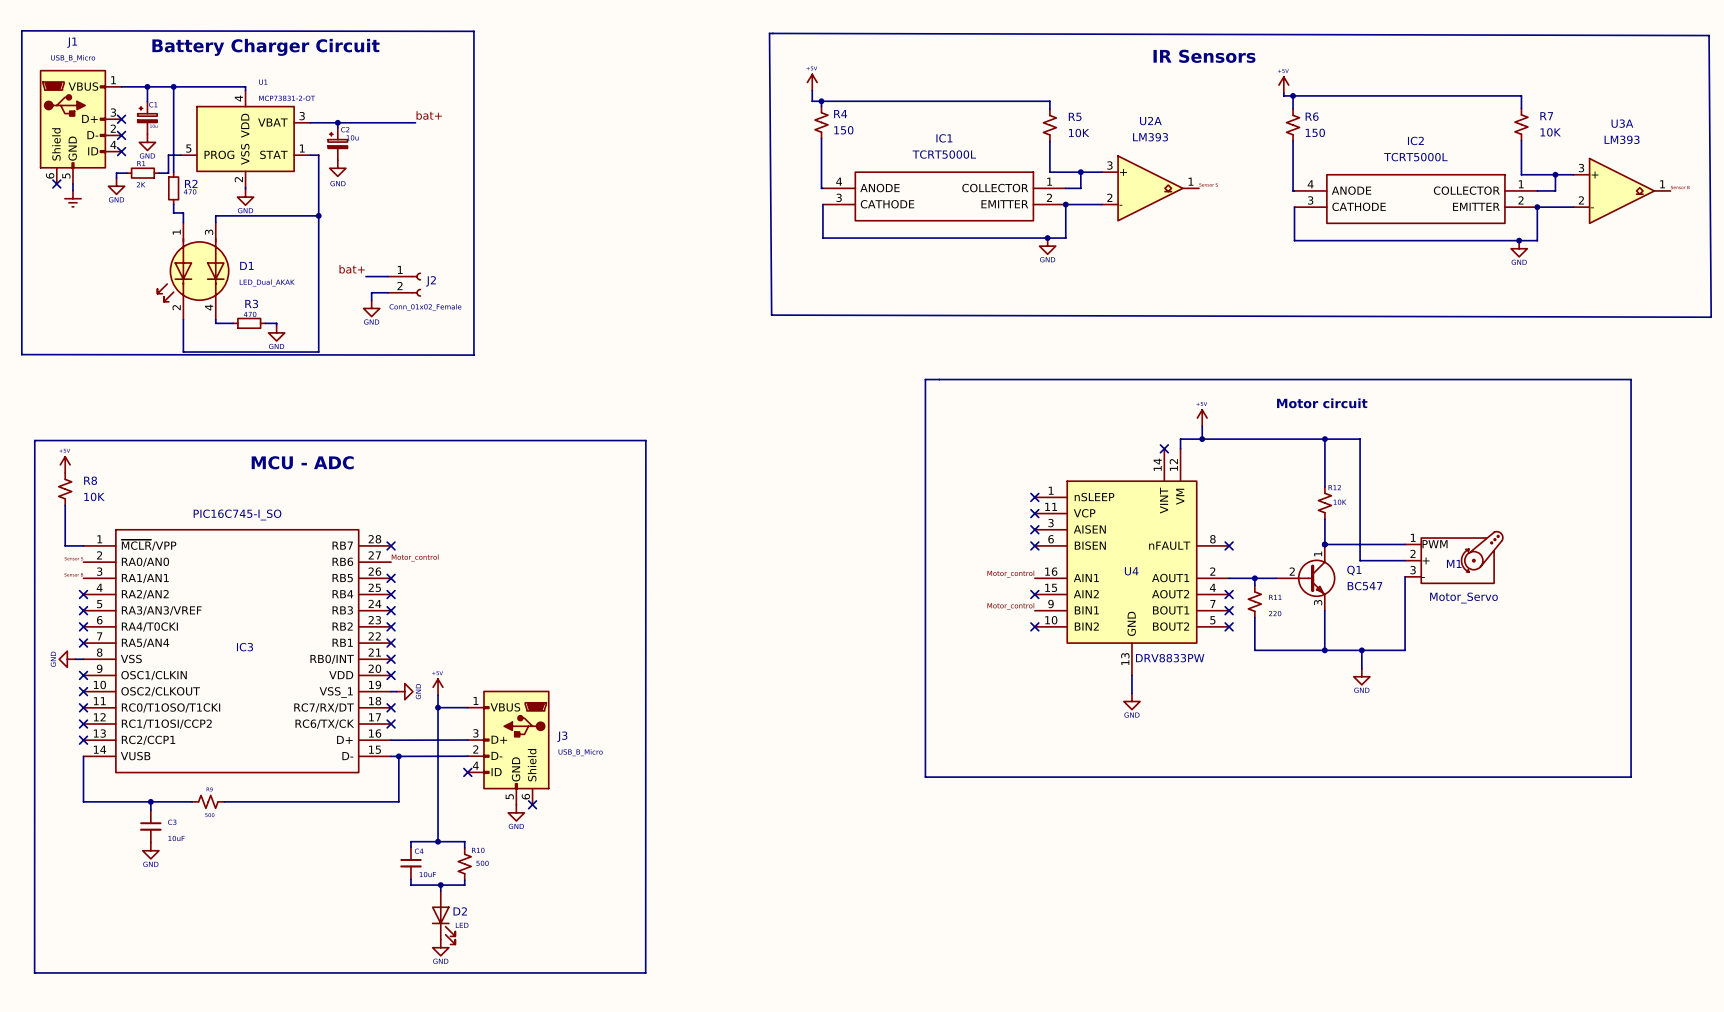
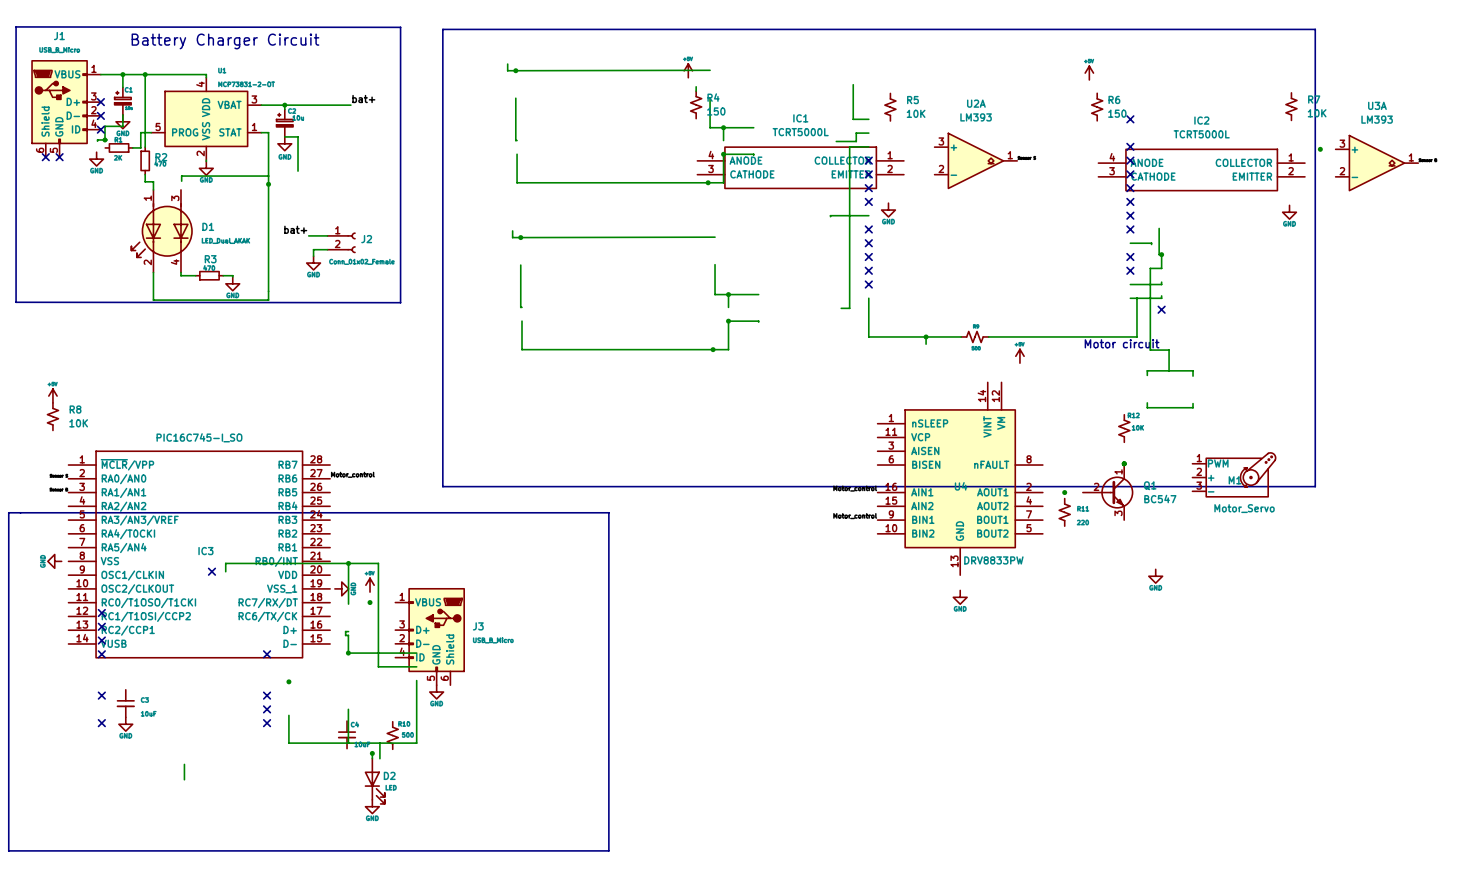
line: none -> (442, 29) (442, 486) (1315, 486) (1315, 29) (442, 29)
line: (772, 33) (1709, 35) (1711, 317) (771, 315) (769, 33) (773, 33) -> none
text: IR Sensors (1204, 56) -> none
wire: none -> (507, 64) (507, 70) (710, 70)
junction: none -> (515, 70)
wire: (812, 90) (812, 101) (1049, 101) (1049, 109) -> none
wire: (1283, 93) (1283, 95) (1521, 95) (1521, 108) -> none
wire: (1293, 95) (1293, 108) -> none
junction: (1293, 95) -> none
wire: none -> (853, 84) (853, 119) (868, 119)
junction: (821, 101) -> none
wire: none -> (515, 98) (517, 140)
wire: none -> (710, 97) (710, 127) (753, 127)
wire: none -> (122, 114) (122, 126) (104, 126) (104, 139)
wire: (821, 138) (822, 188) -> none
no-connect mark: none -> (1130, 119)
wire: (1521, 140) (1521, 174) (1573, 174) -> none
wire: (1049, 141) (1049, 172) (1101, 172) -> none
wire: (1293, 141) (1294, 190) -> none
wire: none -> (723, 127) (723, 140)
junction: none -> (723, 127)
wire: none -> (868, 133) (856, 133) (856, 141) (836, 141)
wire: none -> (284, 136) (298, 136) (298, 171)
junction: none -> (104, 139)
wire: none -> (107, 139) (97, 141)
wire: none -> (868, 146) (849, 146) (849, 308) (841, 308)
no-connect mark: none -> (1130, 146)
wire: (1080, 172) (1080, 188) (1065, 188) -> none
junction: (1080, 172) -> none
wire: (126, 173) (116, 173) (116, 178) -> none
wire: (1555, 174) (1555, 190) (1537, 190) -> none
wire: none -> (517, 154) (517, 182) (723, 182) (723, 154) (753, 155)
junction: none -> (723, 154)
wire: (72, 183) (72, 190) -> none
no-connect mark: none -> (59, 157)
no-connect mark: none -> (868, 160)
no-connect mark: none -> (1130, 160)
power symbol: (72, 198) -> none
wire: (822, 204) (822, 238) (1065, 238) (1065, 204) (1101, 204) -> none
no-connect mark: none -> (868, 174)
junction: (1065, 204) -> none
no-connect mark: none -> (1130, 174)
wire: none -> (268, 176) (181, 176) (181, 181)
wire: (1294, 207) (1294, 240) (1537, 240) (1537, 207) (1573, 207) -> none
junction: (1537, 207) -> none
junction: none -> (708, 182)
wire: (318, 215) (215, 215) (215, 222) -> none
no-connect mark: none -> (868, 188)
no-connect mark: none -> (1130, 188)
no-connect mark: none -> (868, 201)
no-connect mark: none -> (1130, 201)
junction: (1047, 238) -> none
junction: (1519, 240) -> none
wire: none -> (868, 215) (830, 216)
no-connect mark: none -> (1130, 215)
wire: none -> (1159, 228) (1159, 254) (1161, 254) (1161, 268) (1150, 268) (1150, 350) (1169, 350) (1169, 370)
no-connect mark: none -> (868, 229)
no-connect mark: none -> (1130, 229)
wire: none -> (512, 230) (512, 237) (715, 237)
junction: none -> (520, 237)
no-connect mark: none -> (868, 243)
wire: none -> (1130, 243) (1151, 244)
junction: none -> (1161, 254)
no-connect mark: none -> (868, 256)
no-connect mark: none -> (1130, 256)
wire: none -> (520, 265) (522, 307)
wire: none -> (715, 264) (715, 294) (758, 294)
no-connect mark: none -> (868, 270)
no-connect mark: none -> (1130, 270)
wire: none -> (1161, 282) (1161, 284) (1130, 284)
no-connect mark: none -> (868, 284)
wire: none -> (728, 294) (728, 307)
junction: none -> (728, 294)
wire: none -> (1161, 295) (1161, 298) (1130, 298)
wire: none -> (868, 298) (868, 336) (961, 336)
wire: none -> (1136, 298) (1136, 336) (988, 336)
no-connect mark: none -> (1161, 309)
wire: none -> (522, 321) (522, 349) (728, 349) (728, 321) (758, 322)
junction: none -> (728, 321)
line: (925, 379) (925, 777) (1631, 777) (1631, 379) (925, 379) -> none
wire: none -> (926, 336) (926, 344)
junction: none -> (926, 336)
junction: none -> (713, 349)
wire: (1202, 426) (1202, 439) -> none
junction: (1202, 439) -> none
wire: (1324, 439) (1324, 486) -> none
junction: (1324, 439) -> none
line: (34, 440) (34, 972) (645, 972) (645, 440) (34, 440) -> (8, 512) (8, 850) (608, 850) (608, 512) (8, 512)
wire: none -> (1147, 375) (1147, 370) (1193, 370) (1193, 376)
no-connect mark: (1164, 448) -> none
wire: (1180, 448) (1180, 439) (1360, 439) (1360, 560) (1405, 560) -> none
text: MCU - ADC (302, 462) -> none
wire: none -> (1147, 402) (1147, 407) (1193, 407) (1193, 403)
no-connect mark: (1034, 497) -> none
wire: (65, 505) (65, 545) (83, 545) -> none
no-connect mark: (1034, 513) -> none
wire: (1324, 519) (1324, 544) -> none
no-connect mark: (1034, 529) -> none
wire: (1405, 544) (1324, 545) -> none
no-connect mark: (391, 545) -> none
no-connect mark: (1034, 545) -> none
no-connect mark: (1229, 545) -> none
wire: (1405, 576) (1405, 650) (1254, 650) (1254, 617) -> none
no-connect mark: (391, 578) -> none
wire: (1229, 578) (1276, 578) -> none
wire: (1254, 578) (1254, 585) -> none
no-connect mark: (83, 594) -> none
no-connect mark: (391, 594) -> none
no-connect mark: (1034, 594) -> none
no-connect mark: (1229, 594) -> none
no-connect mark: (83, 610) -> none
no-connect mark: (391, 610) -> none
no-connect mark: (1229, 610) -> none
wire: (1324, 610) (1324, 650) -> none
no-connect mark: (83, 626) -> none
no-connect mark: (391, 626) -> none
no-connect mark: (1034, 626) -> none
no-connect mark: (1229, 626) -> none
no-connect mark: (83, 643) -> none
no-connect mark: (391, 643) -> none
junction: (1324, 650) -> none
wire: (1361, 650) (1361, 668) -> none
junction: (1361, 650) -> none
wire: (75, 659) (83, 659) -> none
no-connect mark: (391, 659) -> none
wire: none -> (348, 563) (348, 604)
junction: none -> (348, 563)
no-connect mark: none -> (211, 571)
wire: none -> (225, 571) (225, 563) (378, 563) (378, 666) (416, 666)
no-connect mark: (83, 675) -> none
no-connect mark: (391, 675) -> none
wire: (1131, 675) (1131, 693) -> none
no-connect mark: (83, 691) -> none
wire: (391, 691) (396, 691) -> none
wire: (438, 695) (438, 841) -> none
no-connect mark: (83, 707) -> none
no-connect mark: (391, 707) -> none
wire: (438, 707) (467, 707) -> none
no-connect mark: none -> (101, 613)
no-connect mark: (83, 724) -> none
no-connect mark: (391, 724) -> none
no-connect mark: none -> (101, 626)
no-connect mark: (83, 740) -> none
wire: (467, 740) (391, 740) -> none
wire: none -> (348, 631) (345, 631) (345, 635) (348, 635) (348, 654)
no-connect mark: none -> (101, 640)
wire: (83, 756) (83, 801) (192, 801) -> none
wire: (391, 756) (398, 756) -> none
wire: (398, 756) (398, 801) (224, 801) -> none
junction position: (398, 756) -> (348, 653)
wire: (467, 756) (398, 756) -> none
wire: none -> (348, 653) (416, 653)
no-connect mark: none -> (101, 654)
no-connect mark: none -> (267, 654)
no-connect mark: (467, 772) -> none
wire: none -> (416, 680) (416, 743) (288, 743) (288, 715)
junction: none -> (288, 681)
wire: (150, 801) (150, 810) -> none
junction: (150, 801) -> none
part position: (208, 801) -> (974, 336)
no-connect mark: (532, 804) -> none
no-connect mark: none -> (101, 695)
no-connect mark: none -> (267, 695)
no-connect mark: none -> (267, 709)
wire: none -> (348, 709) (348, 743)
junction: (438, 841) -> none
wire: (410, 847) (410, 841) (464, 841) (464, 847) -> none
no-connect mark: none -> (101, 723)
no-connect mark: none -> (267, 723)
wire: none -> (379, 743) (379, 758)
wire: (410, 879) (410, 885) (464, 885) (464, 880) -> none
wire: none -> (184, 764) (184, 779)

